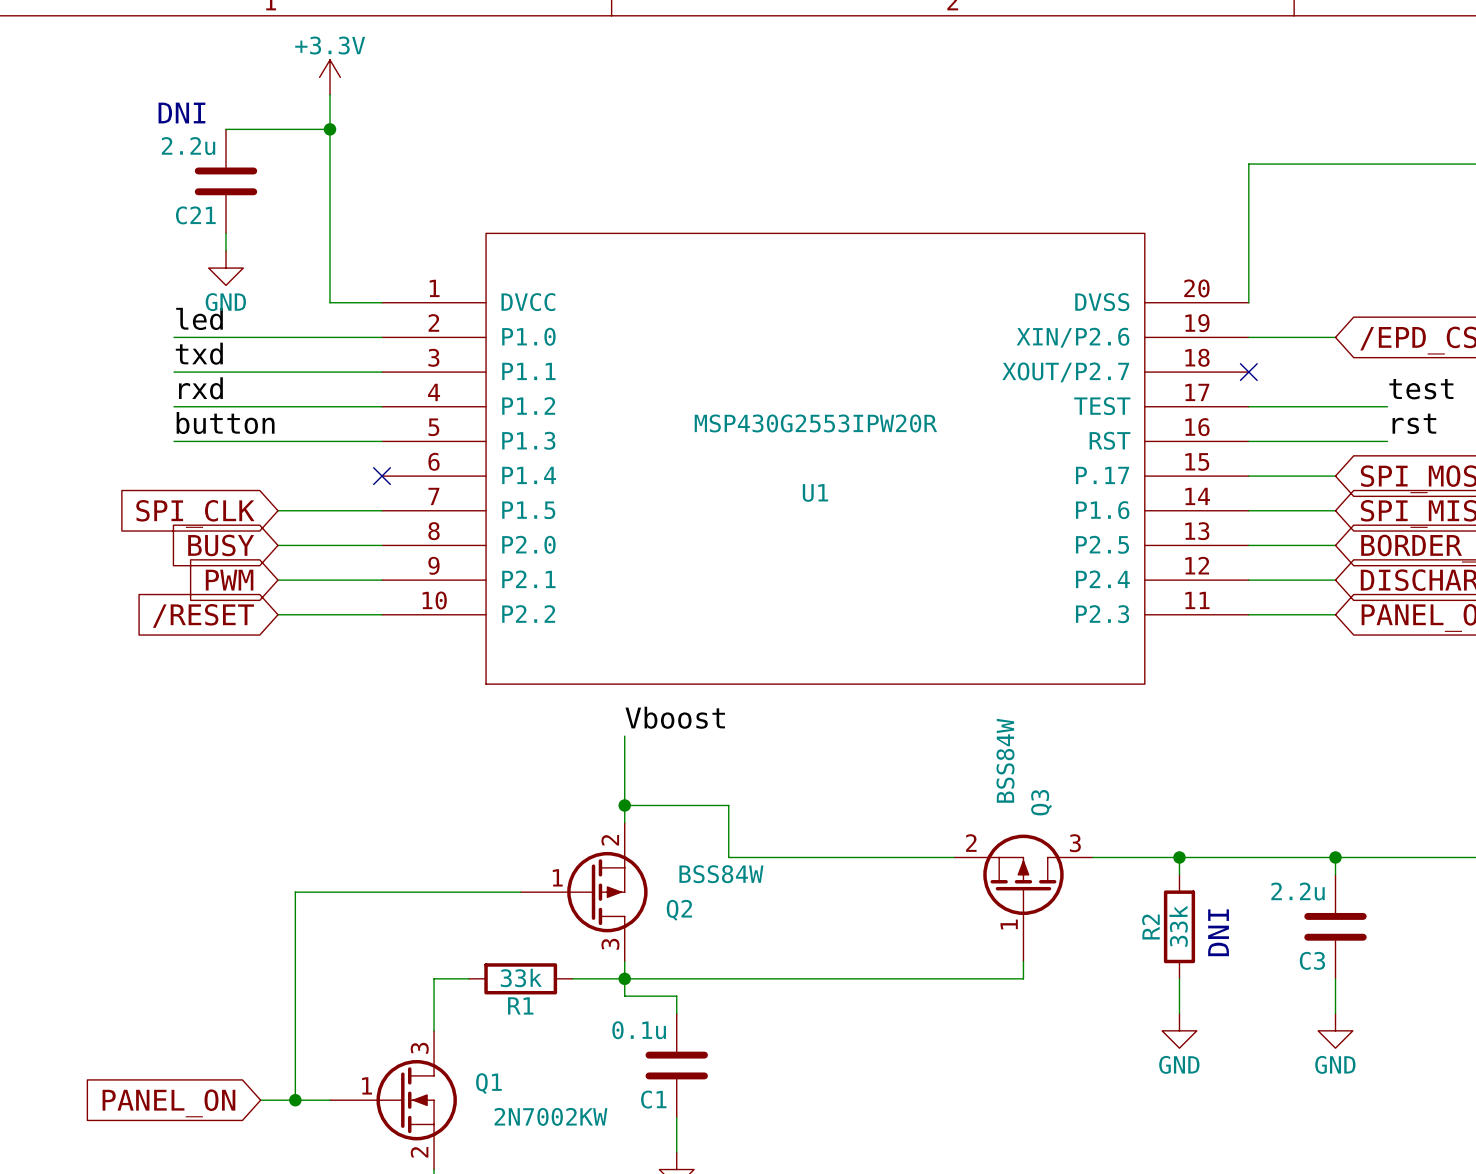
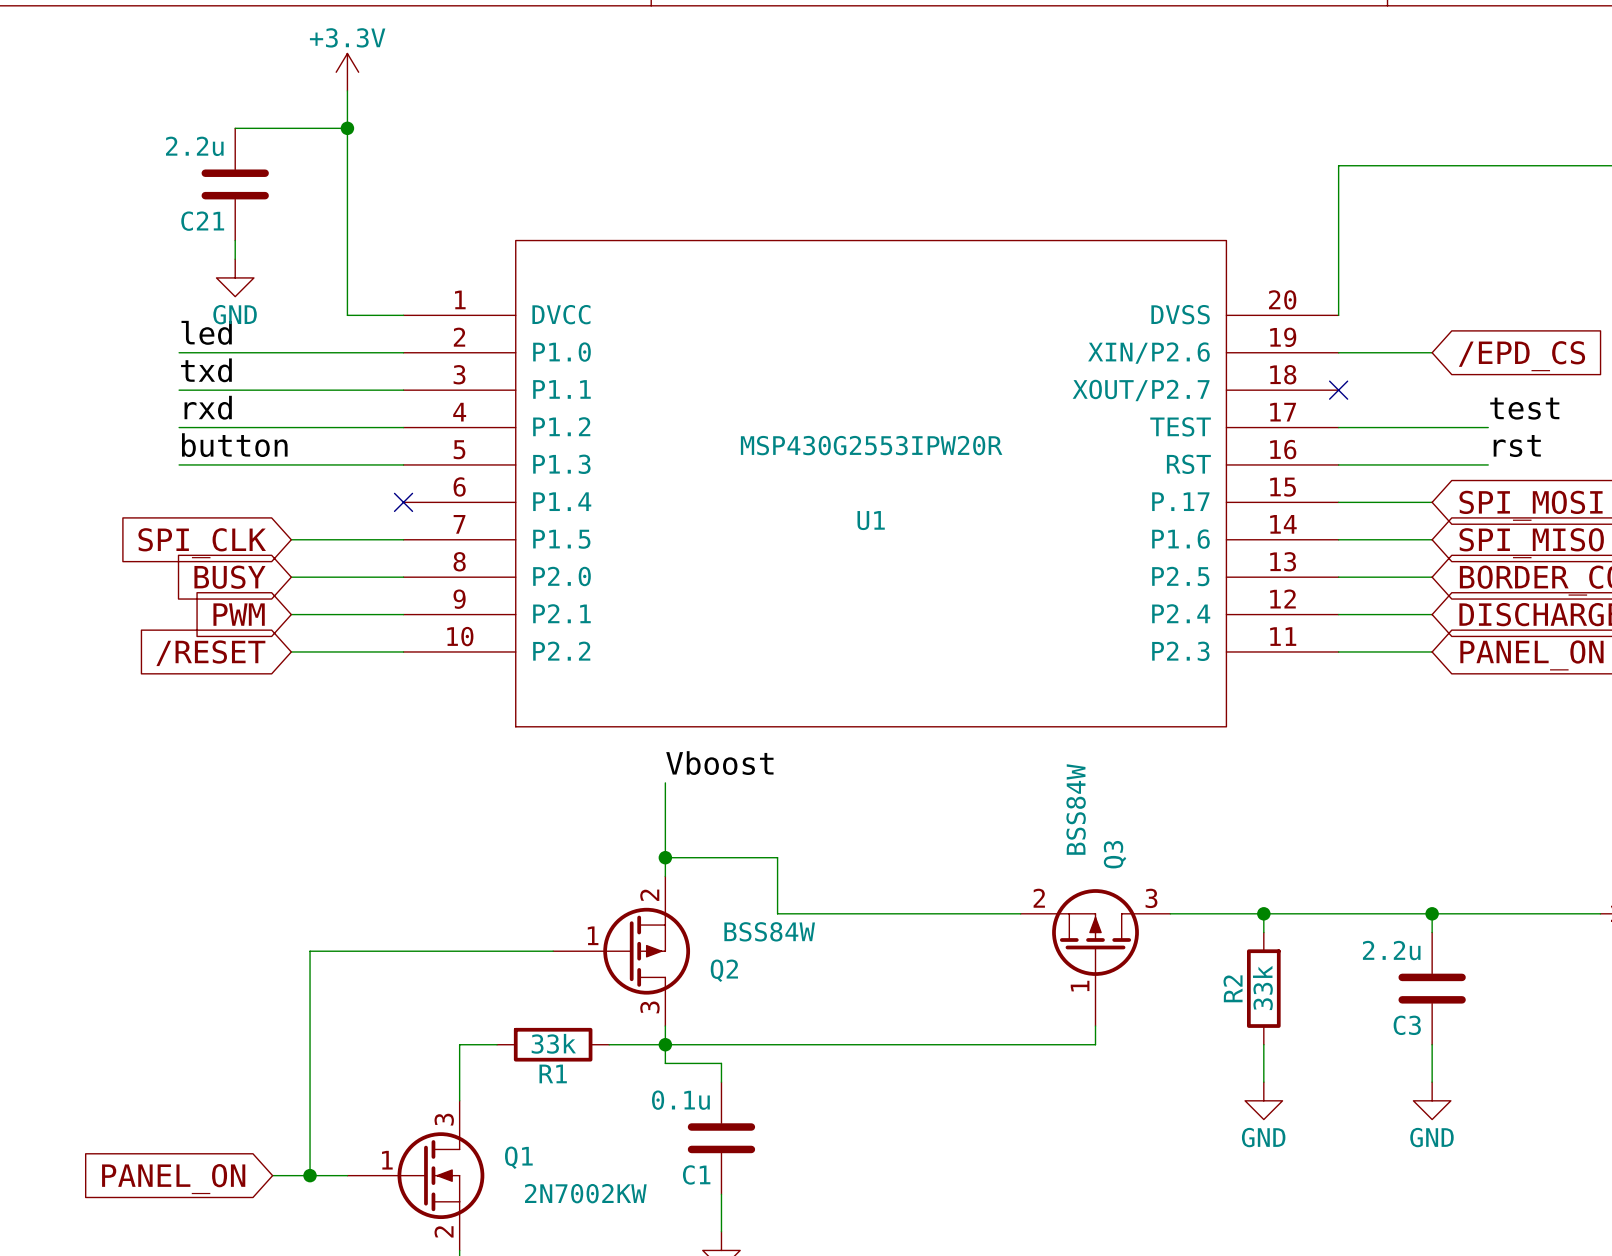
text: DNI (181, 113) -> none
text: DNI (1218, 932) -> none

